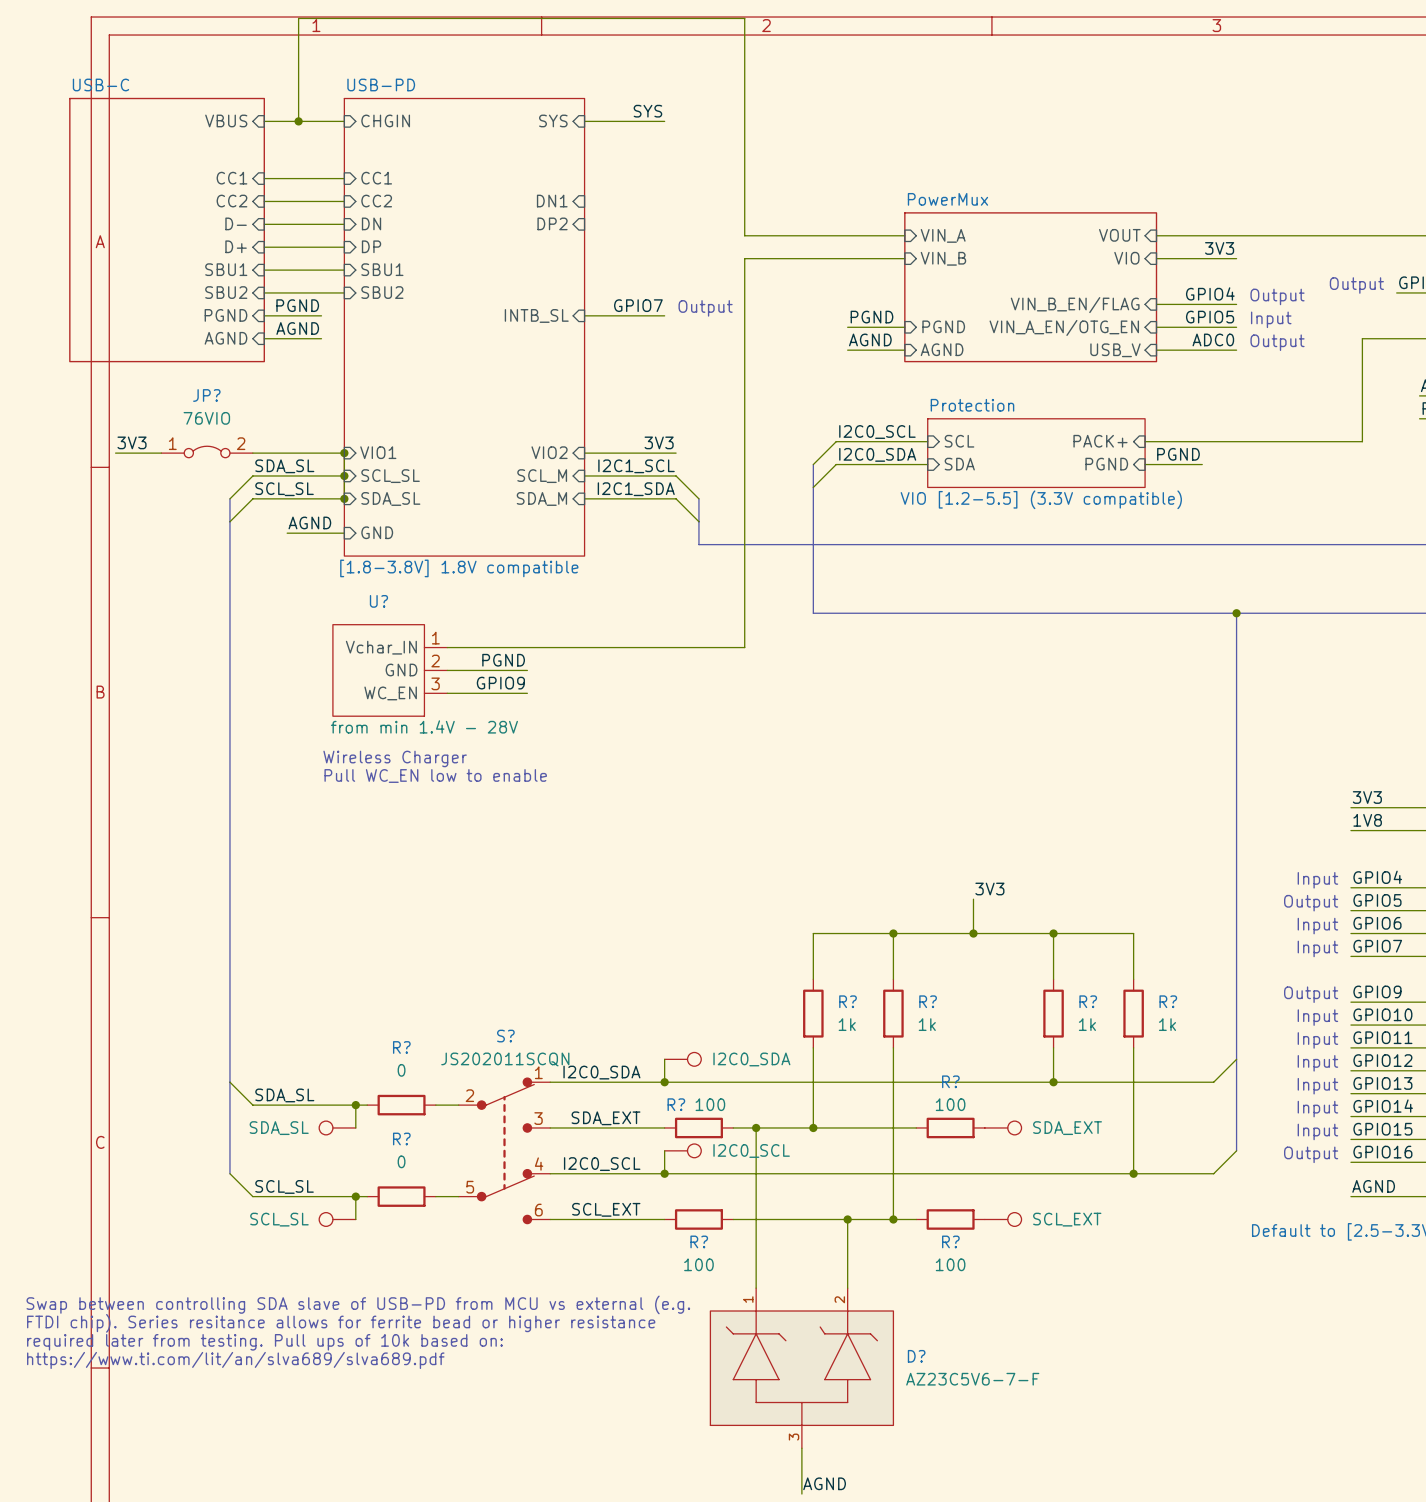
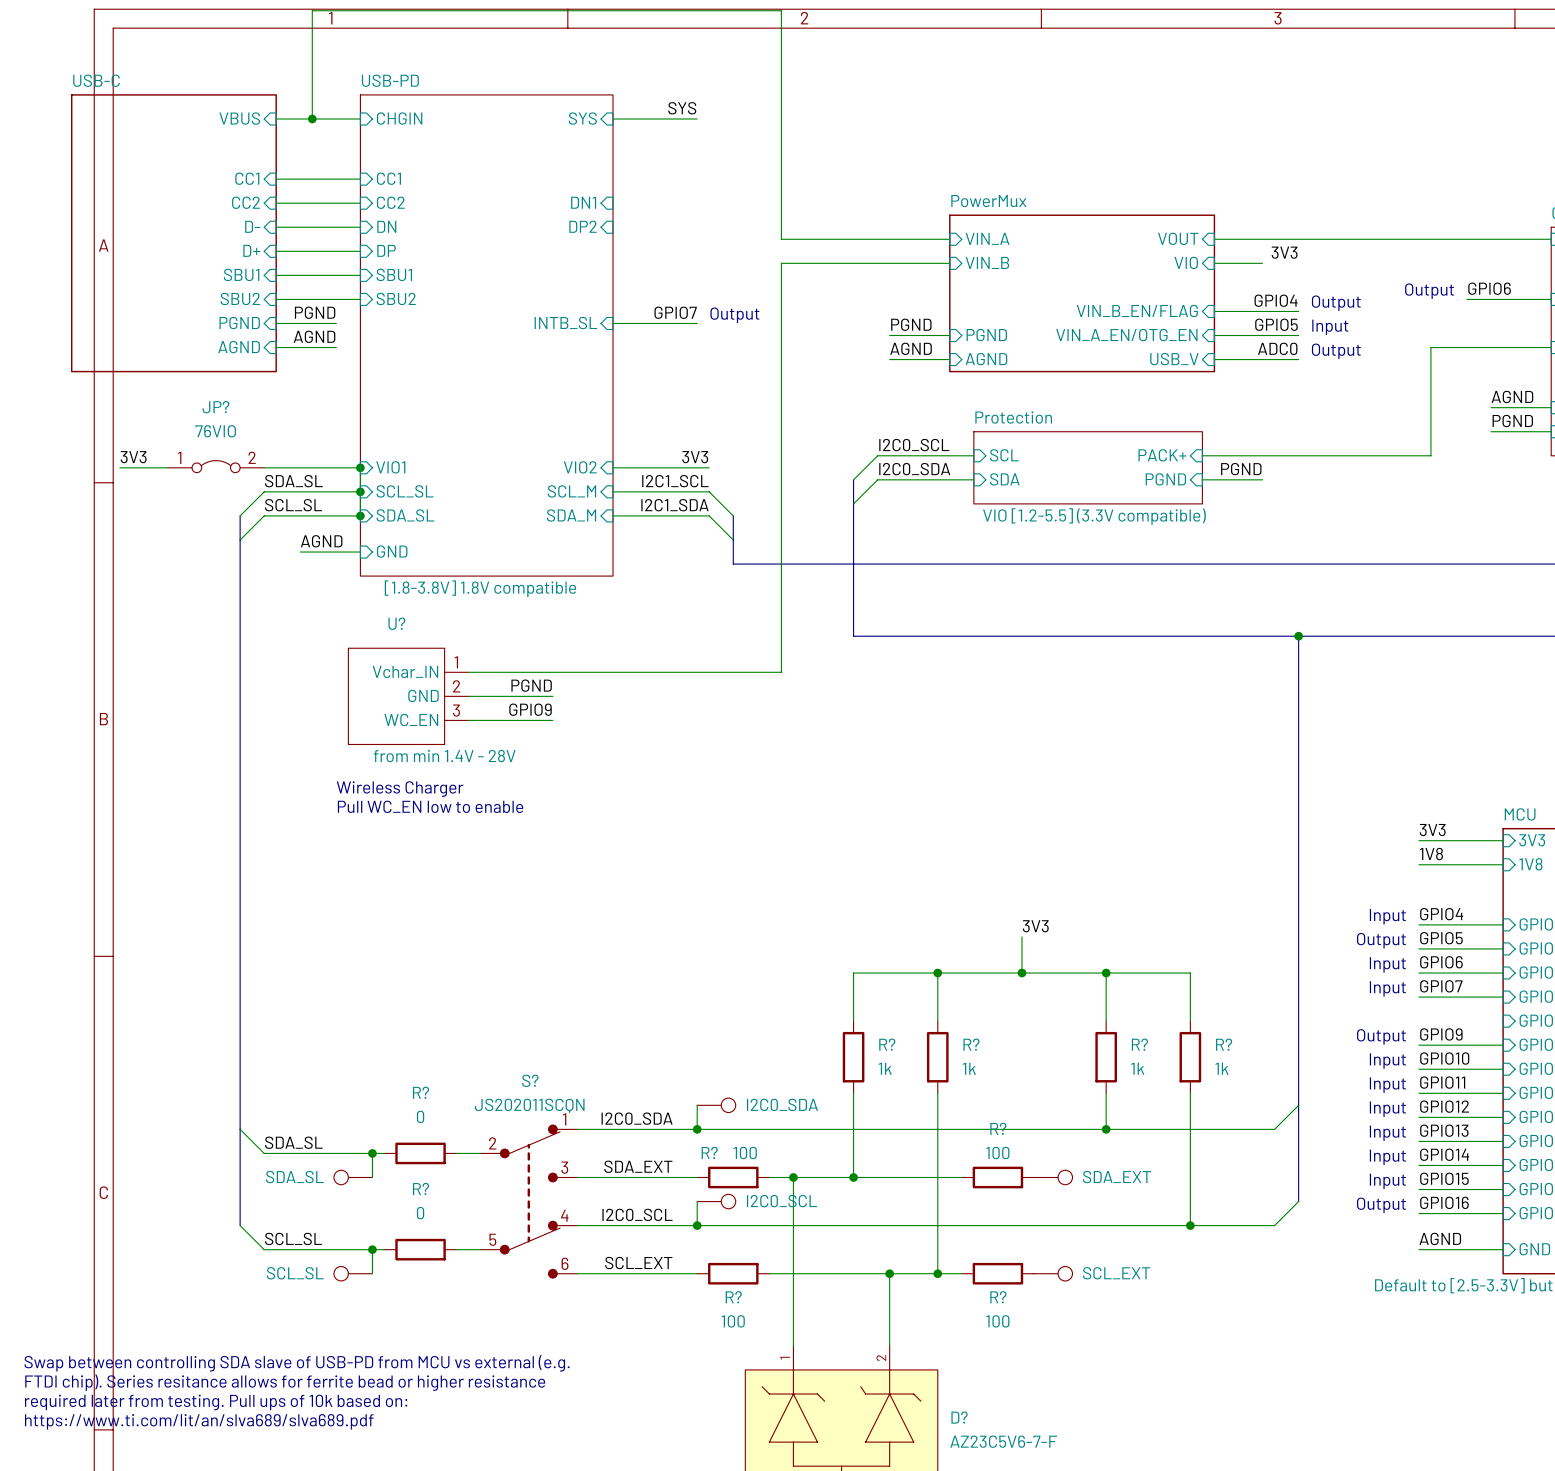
wire: (1202, 258) (1236, 258) -> none

